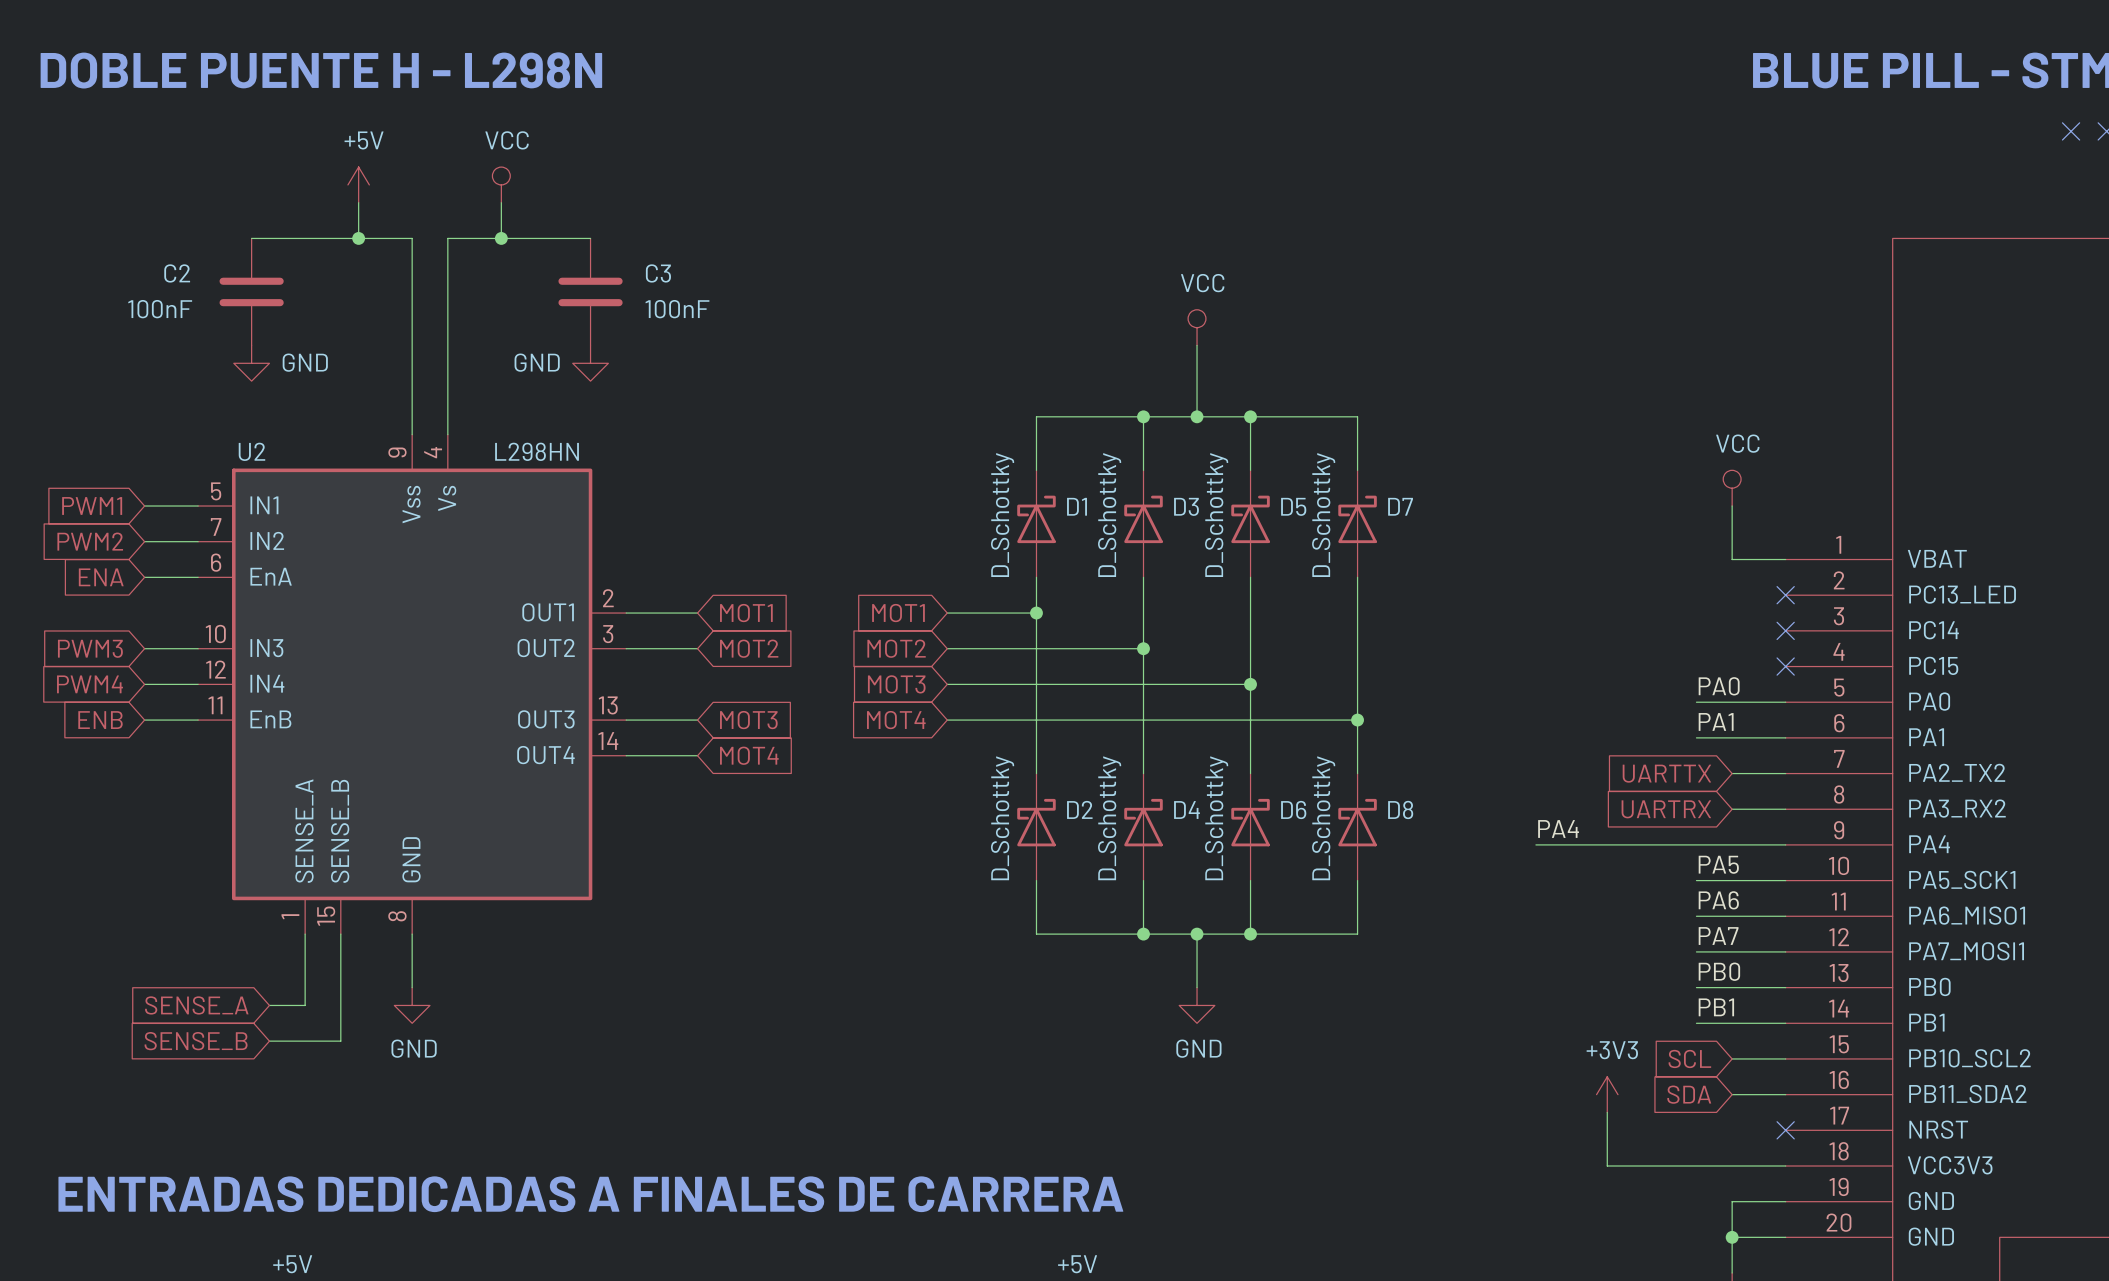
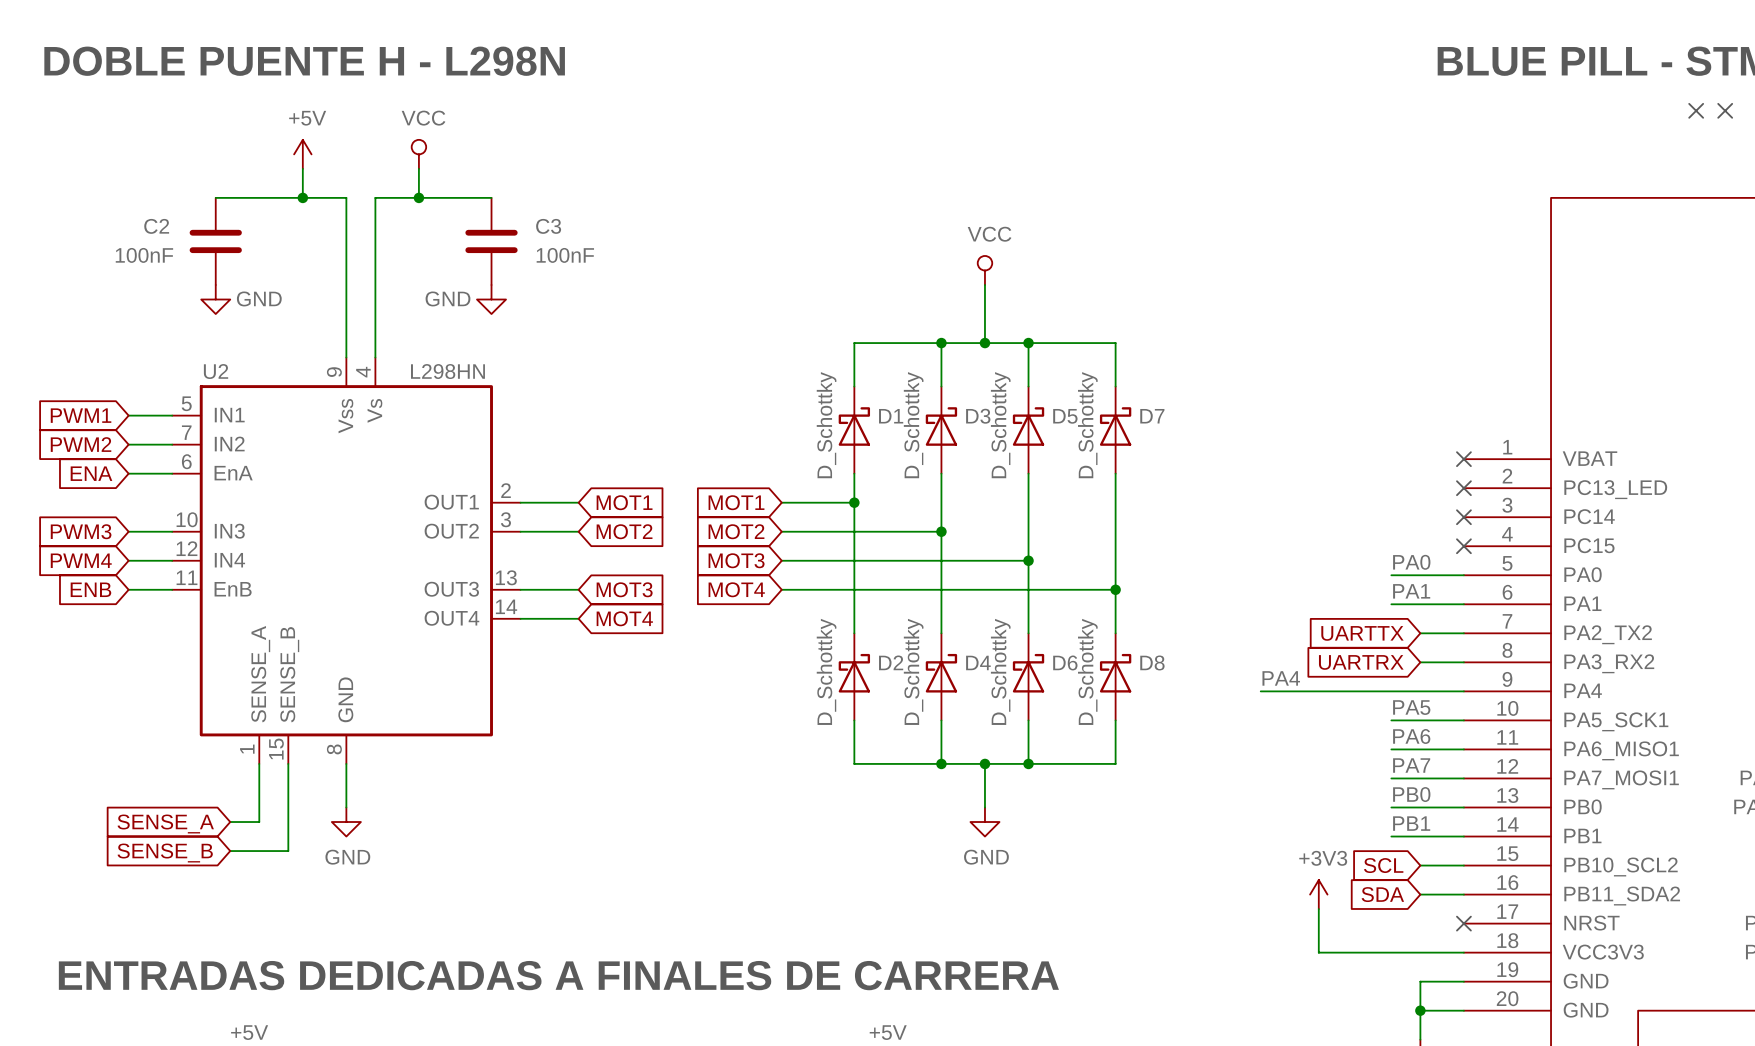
power symbol: VCC (1732, 488) -> none
wire: (1732, 506) (1732, 559) (1785, 559) -> none
no-connect mark: none -> (1463, 459)

